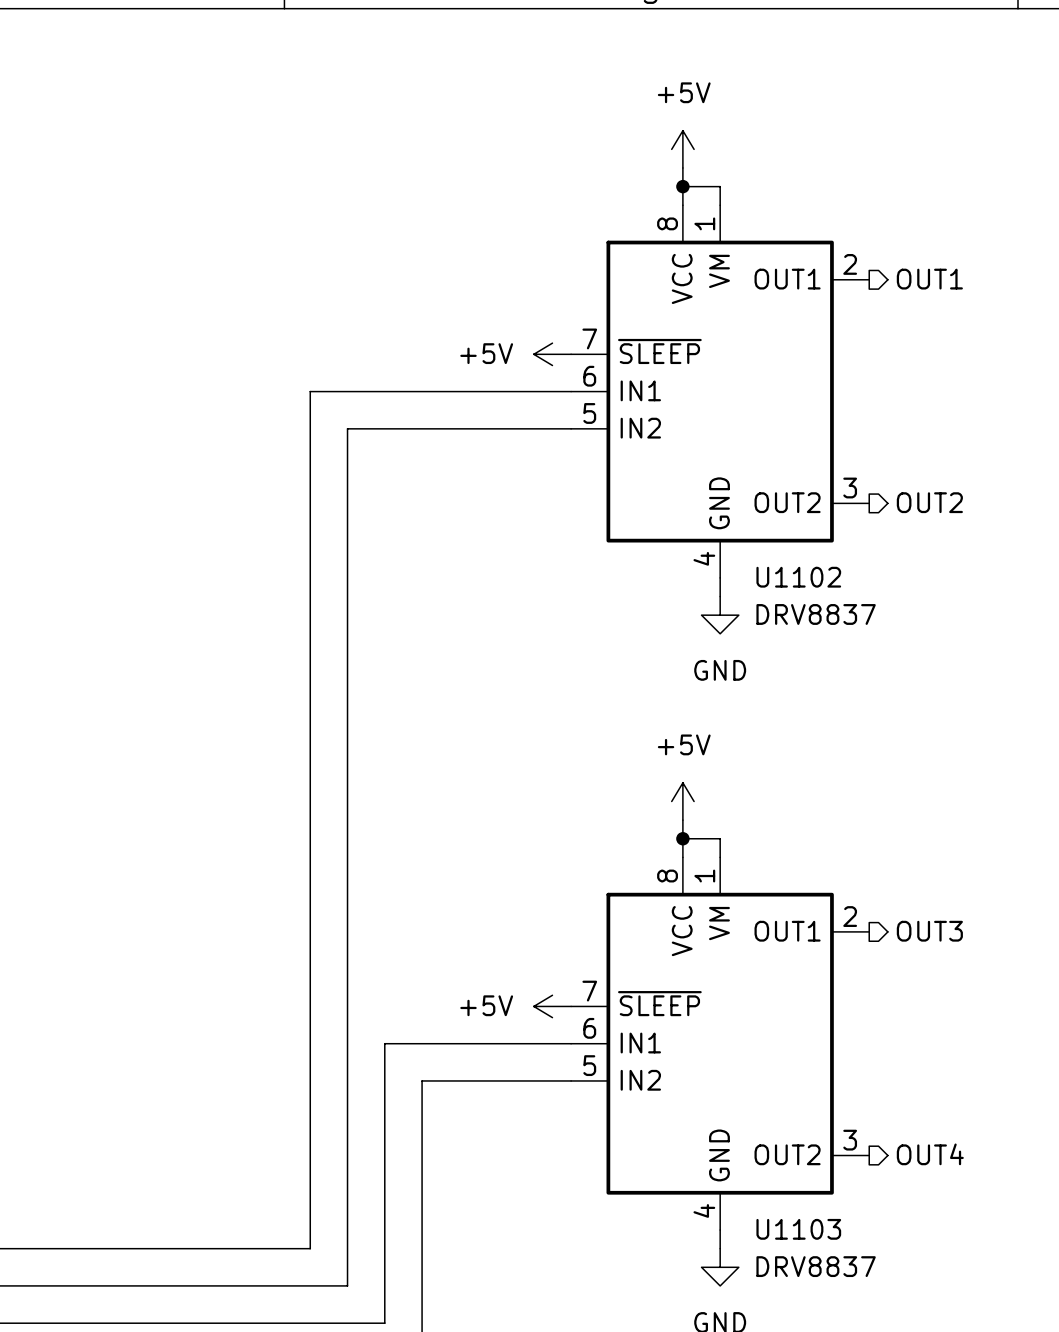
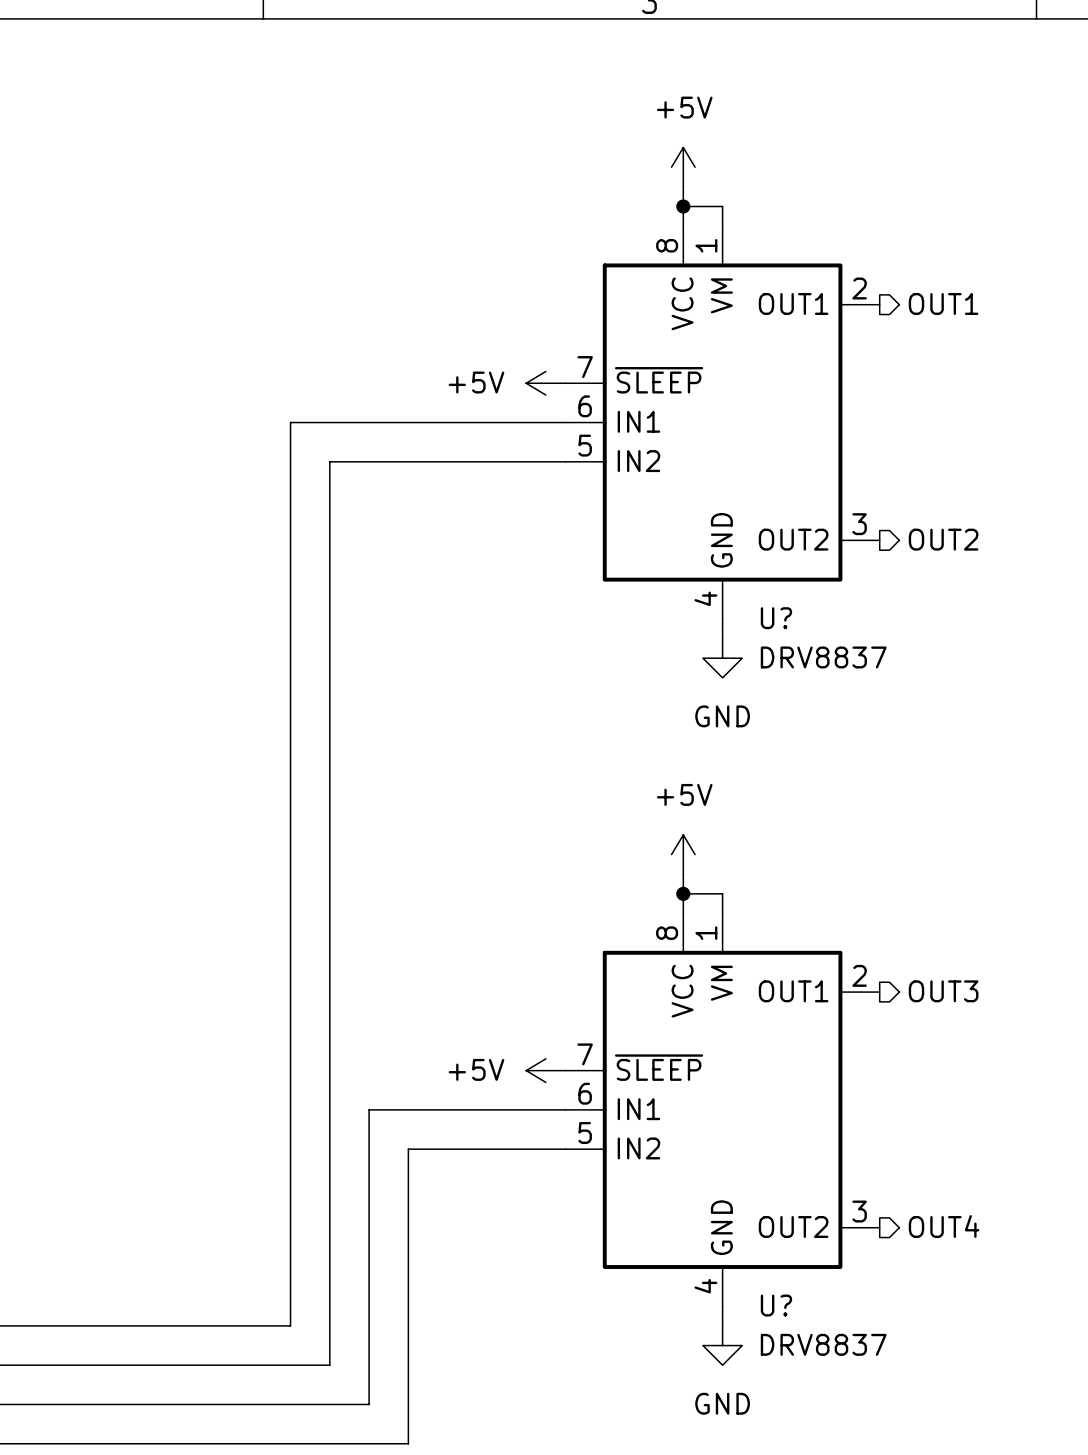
U1102 name: U1102 (798, 577) -> U? (776, 618)
U1103 name: U1103 (798, 1229) -> U? (776, 1305)

